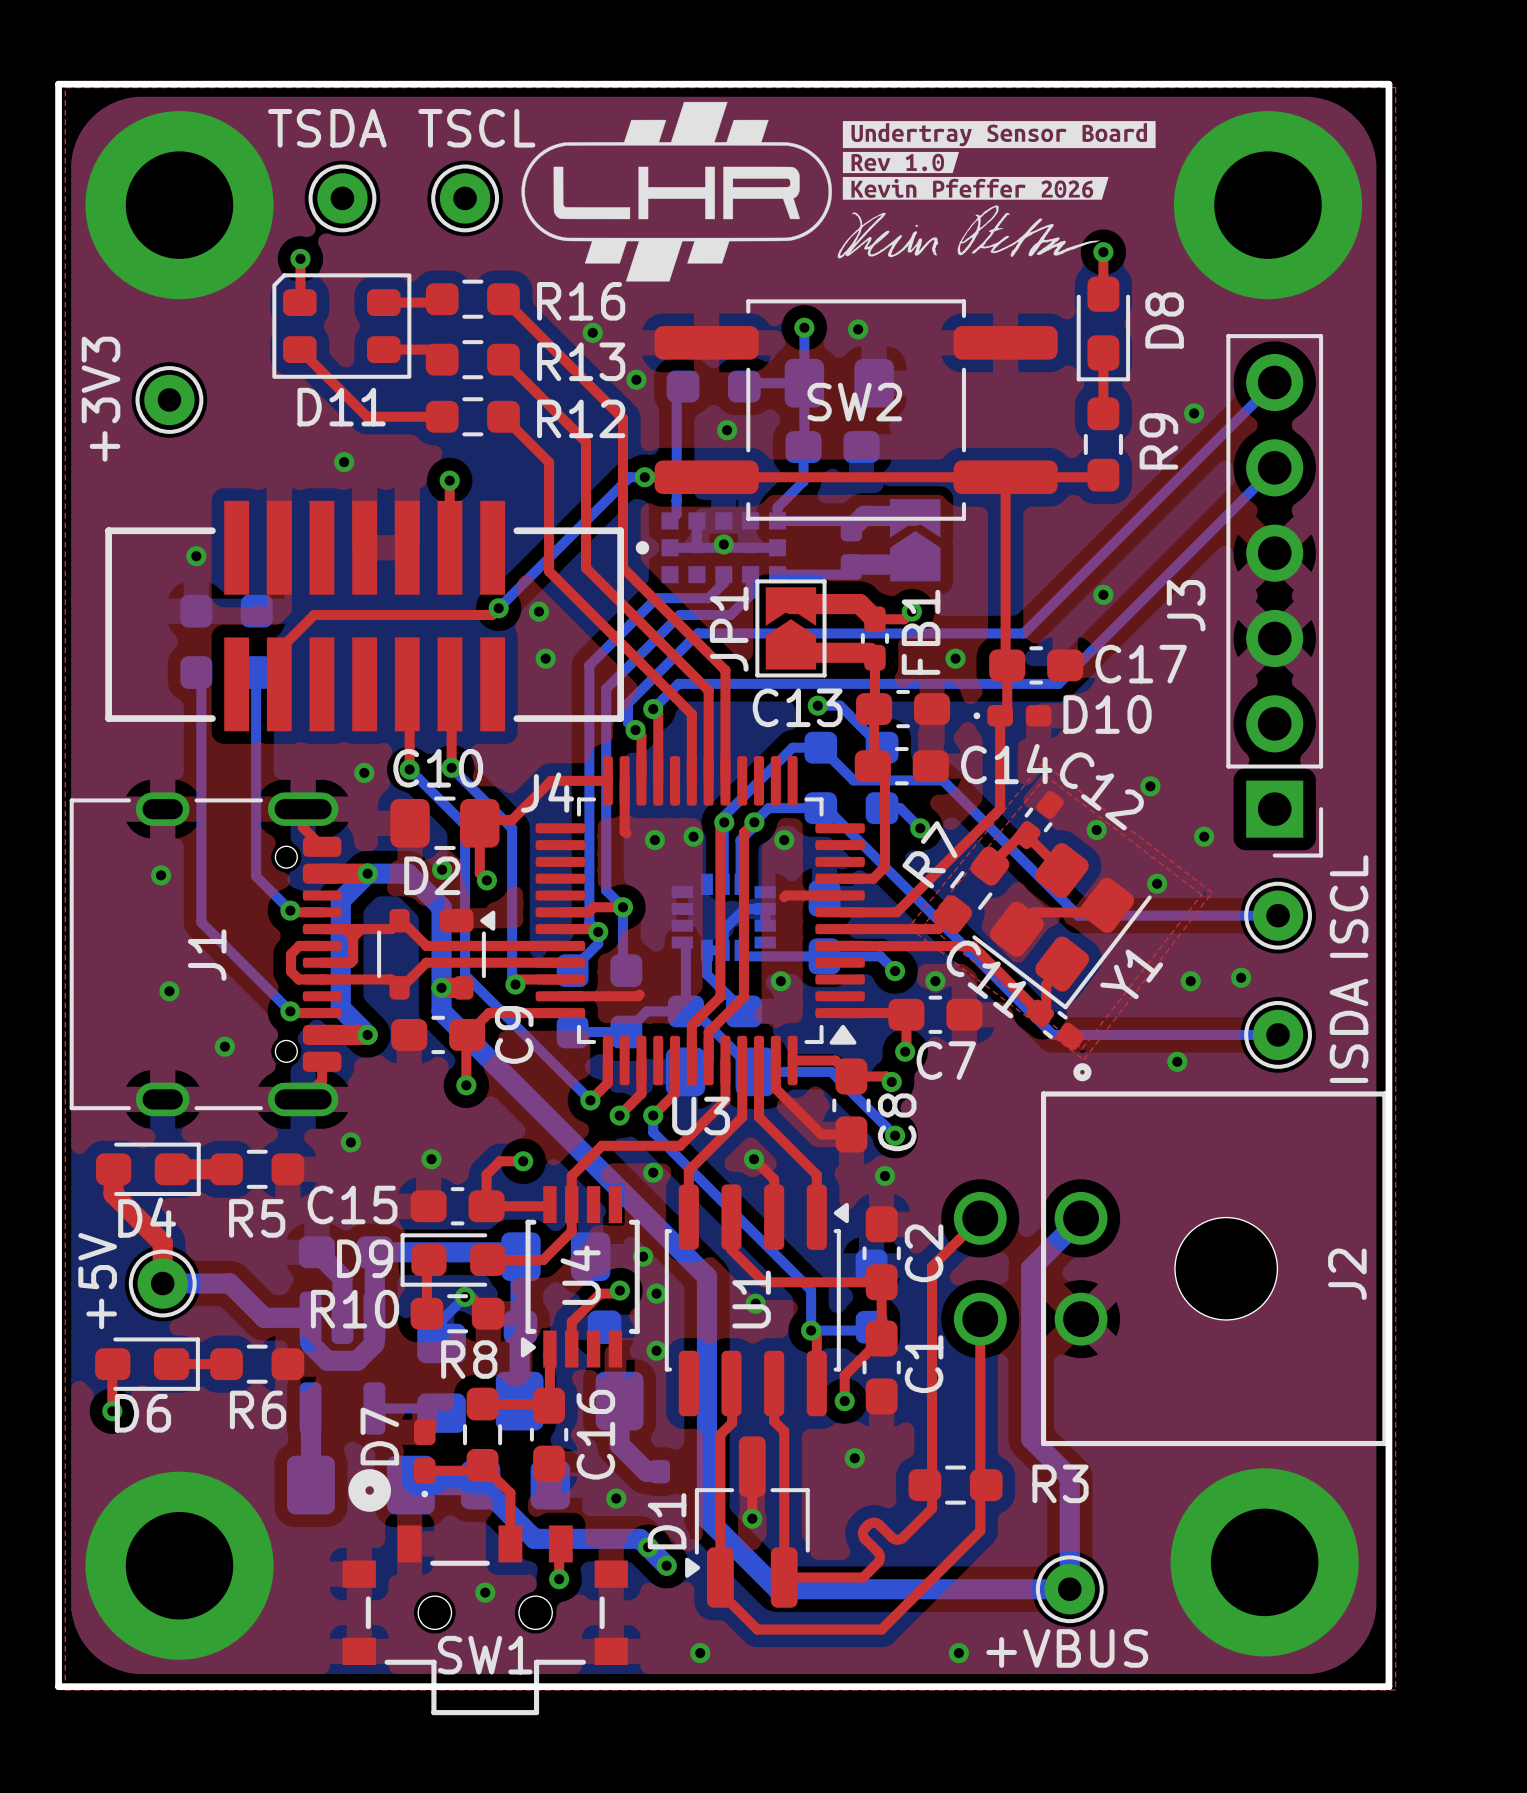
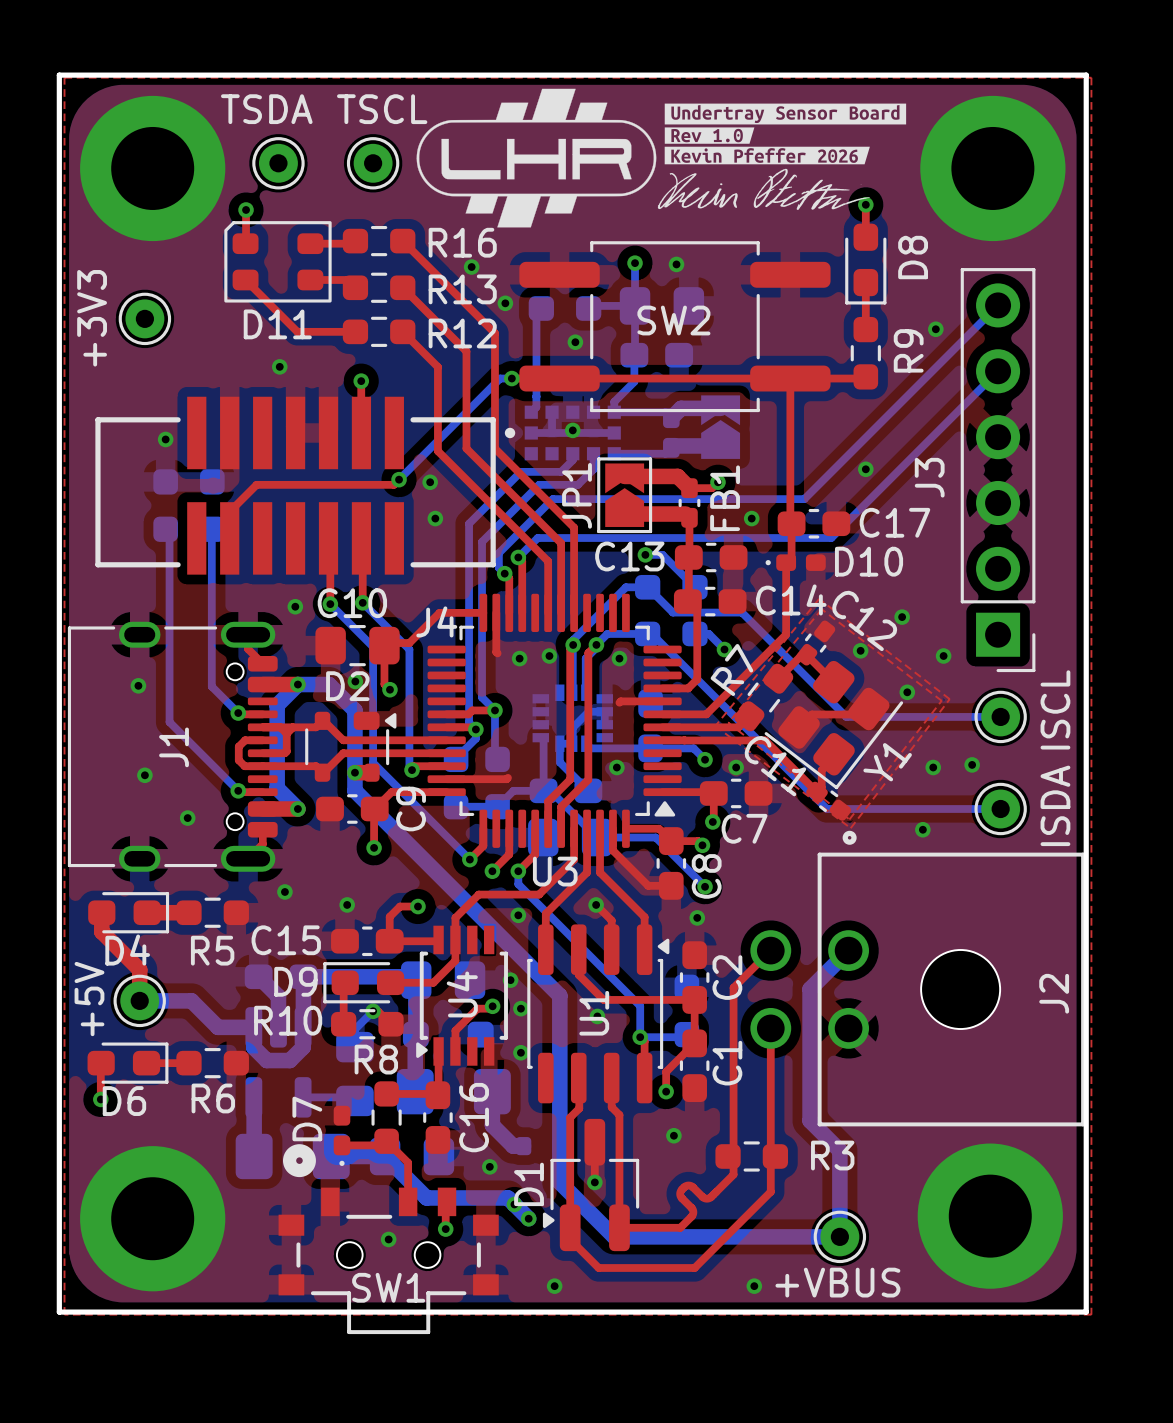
drawing shape: [837, 205, 1101, 259] -> [657, 168, 870, 210]

